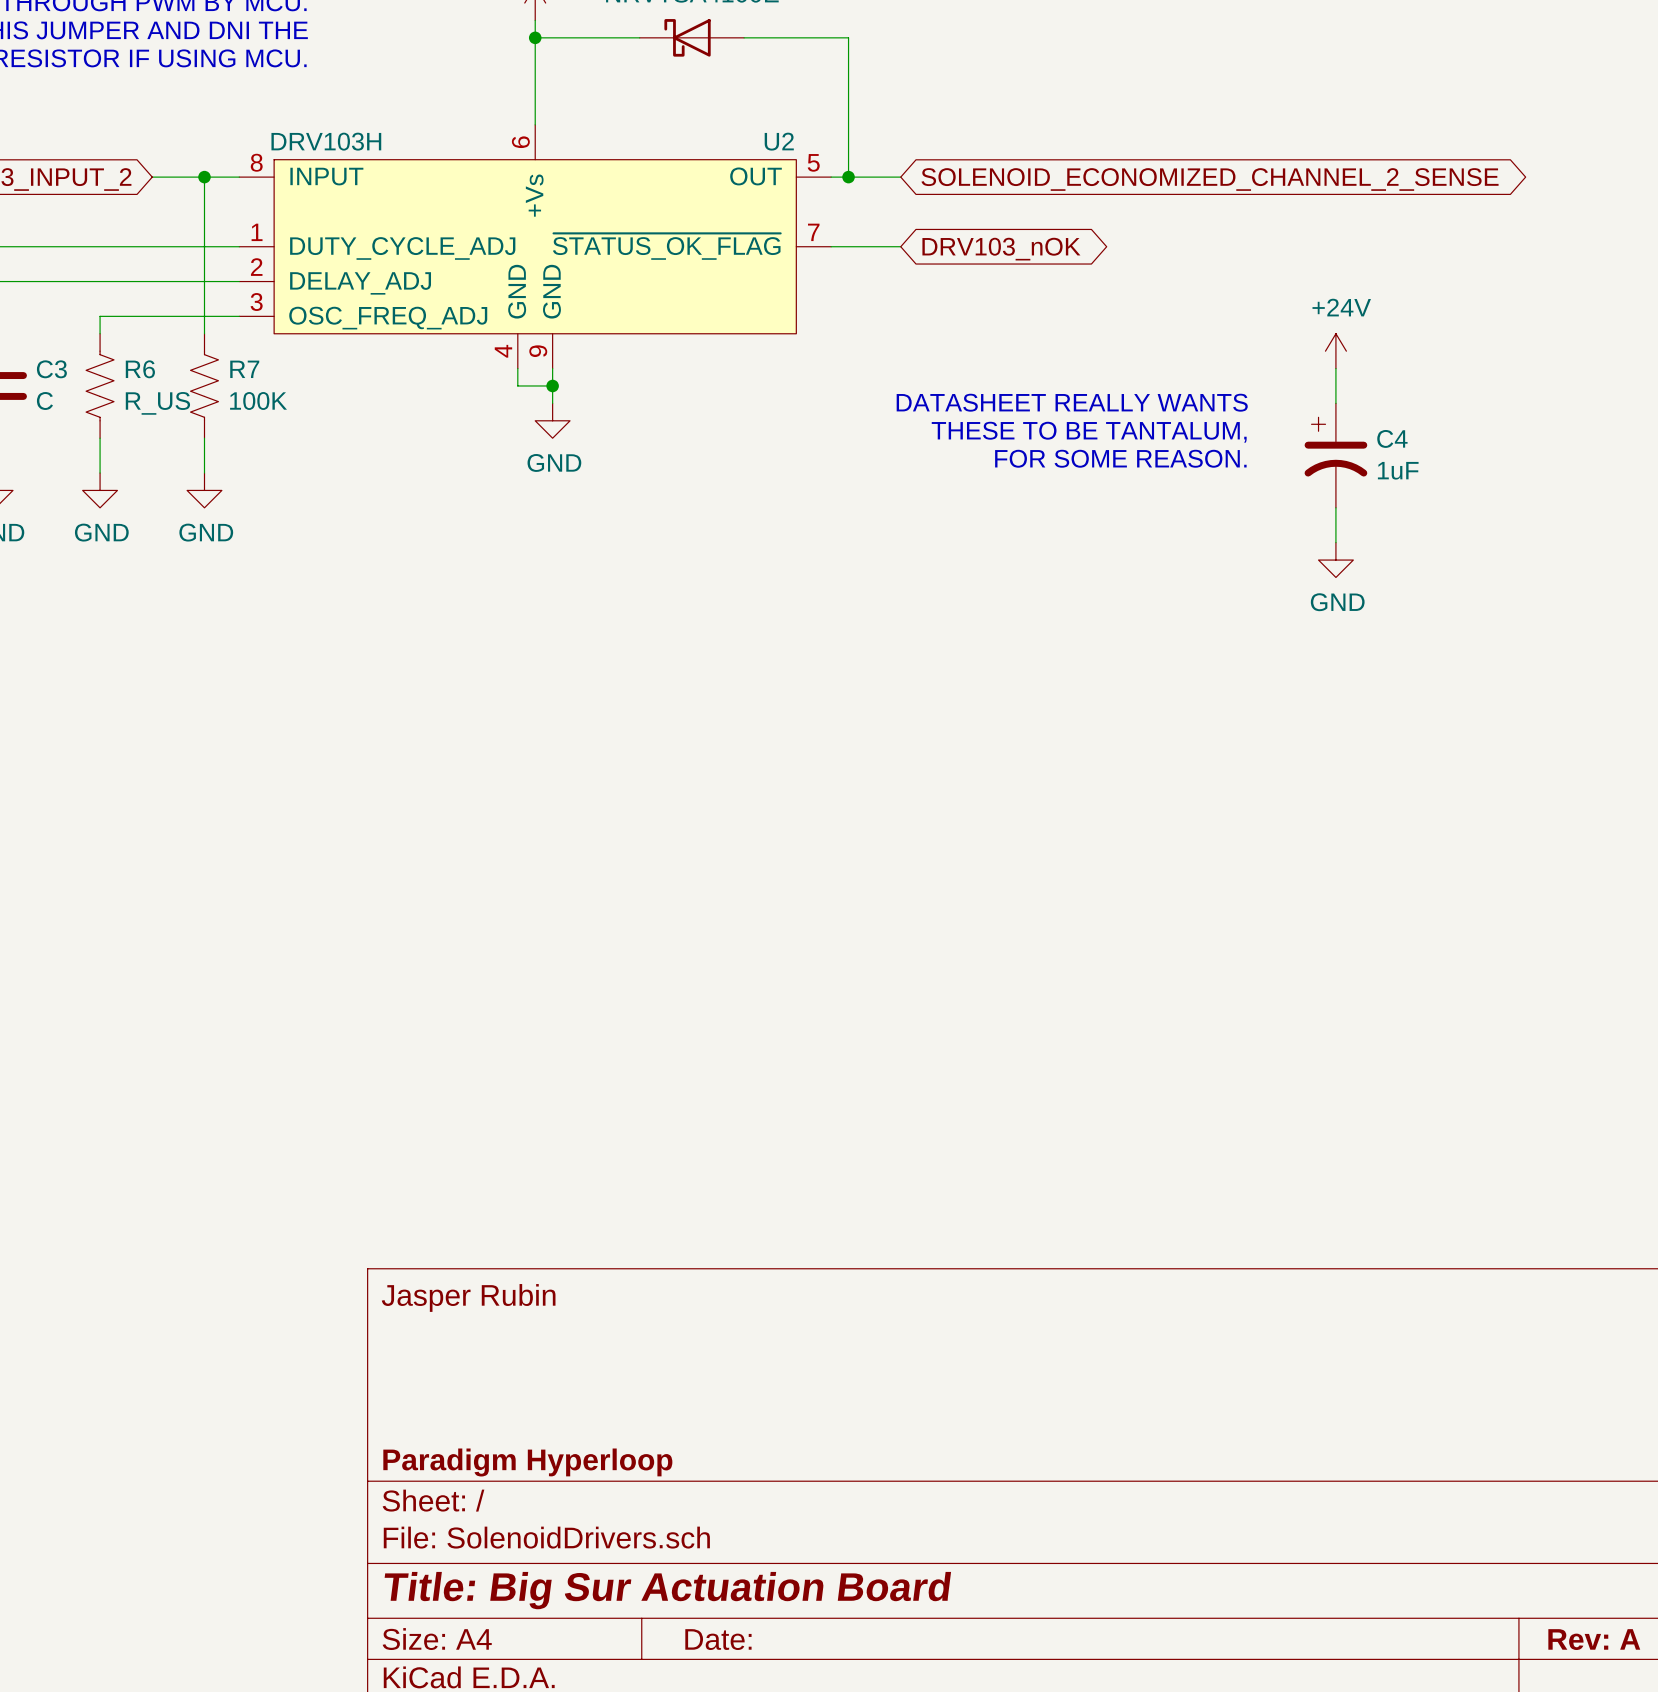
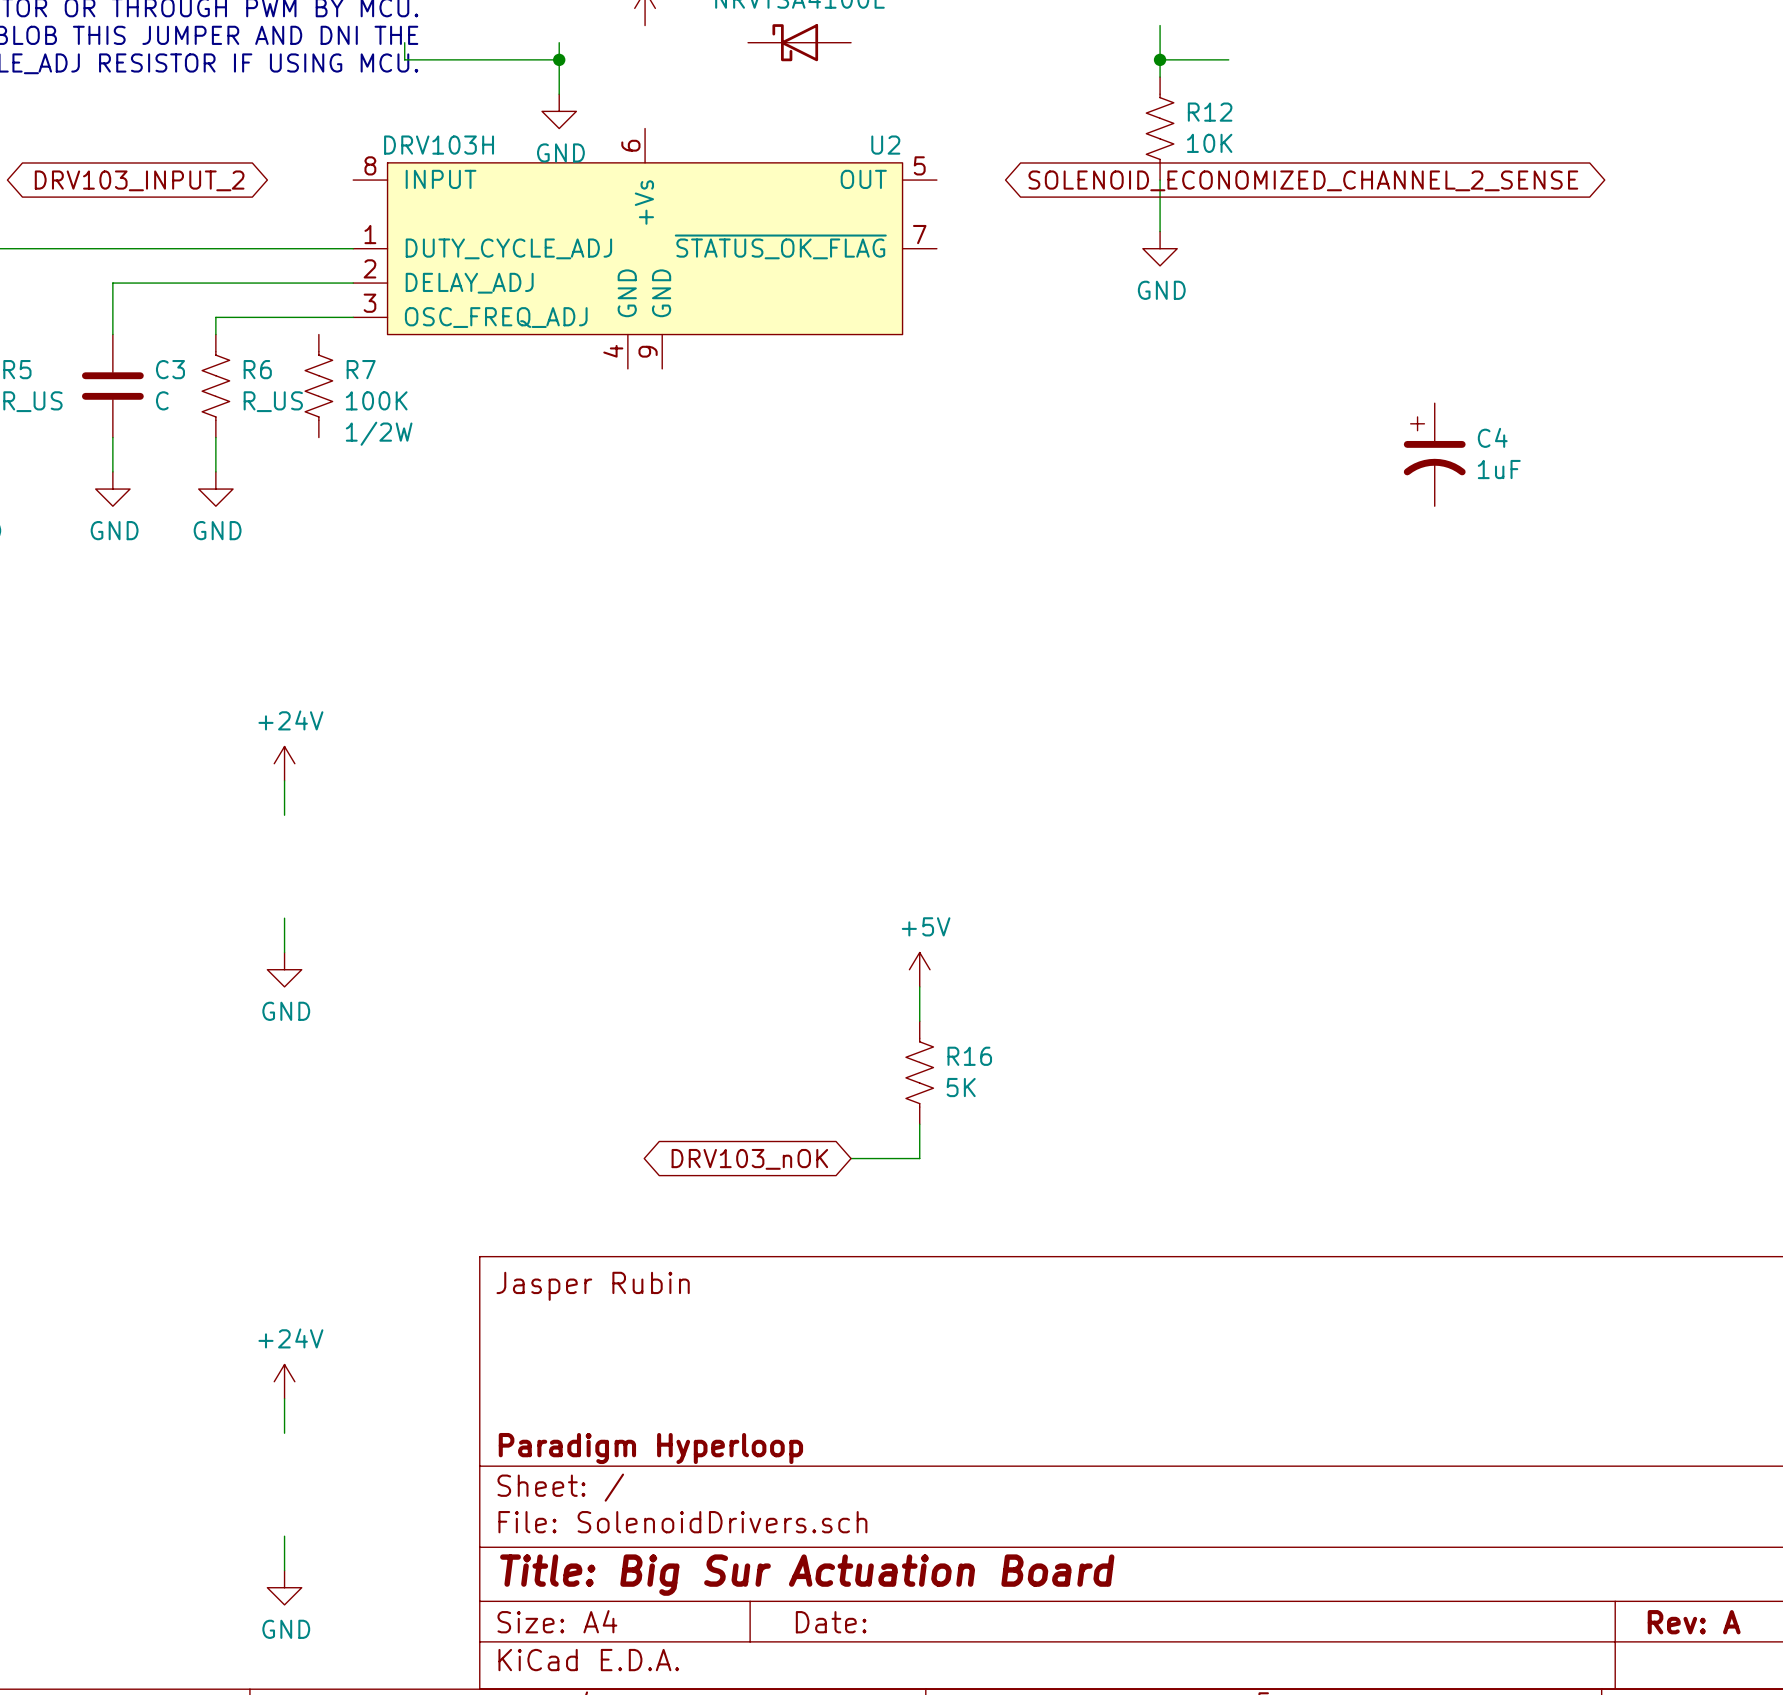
wire: (535, 20) (535, 124) -> none
wire: none -> (1160, 25) (1160, 77)
wire: none -> (404, 42) (404, 59) (559, 59)
wire: none -> (559, 42) (559, 94)
wire: (535, 37) (639, 37) -> none
junction: (535, 37) -> none
wire: (744, 37) (848, 37) (848, 177) -> none
junction: none -> (559, 59)
junction: none -> (1160, 59)
power symbol: none -> GND (559, 111)
R12: none -> 10K (1160, 128)
wire: (152, 177) (239, 177) -> none
wire: (204, 177) (204, 333) -> none
junction: (204, 177) -> none
wire: (831, 177) (900, 177) -> (1160, 59) (1228, 59)
junction: (848, 177) -> none
wire: none -> (1160, 180) (1160, 231)
wire: (831, 246) (900, 246) -> none
power symbol: none -> GND (1160, 248)
global label: DRV103_nOK (1001, 249) -> none
power symbol: +24V (1335, 351) -> none
wire: (517, 368) (517, 385) (552, 385) -> none
wire: (552, 368) (552, 403) -> none
wire: (1335, 368) (1335, 403) -> none
junction: (552, 385) -> none
text: DATASHEET REALLY WANTS (1072, 402) -> none
power symbol: GND (552, 420) -> none
R7 text: none -> 1/2W (379, 433)
text: THESE TO BE TANTALUM, (1089, 432) -> none
wire: (204, 438) (204, 473) -> none
text: FOR SOME REASON. (1120, 458) -> none
power symbol: GND (204, 490) -> none
wire: (1335, 507) (1335, 542) -> none
power symbol: GND (1335, 560) -> none
power symbol: none -> +24V (284, 763)
wire: none -> (284, 780) (284, 815)
wire: none -> (284, 918) (284, 952)
power symbol: none -> GND (284, 969)
power symbol: none -> +5V (919, 969)
wire: none -> (919, 986) (919, 1021)
R16: none -> 5K (919, 1072)
wire: none -> (919, 1124) (919, 1158) (851, 1158)
global label: none -> DRV103_nOK (749, 1159)
power symbol: none -> +24V (284, 1381)
wire: none -> (284, 1398) (284, 1433)
wire: none -> (284, 1536) (284, 1570)
power symbol: none -> GND (284, 1587)

